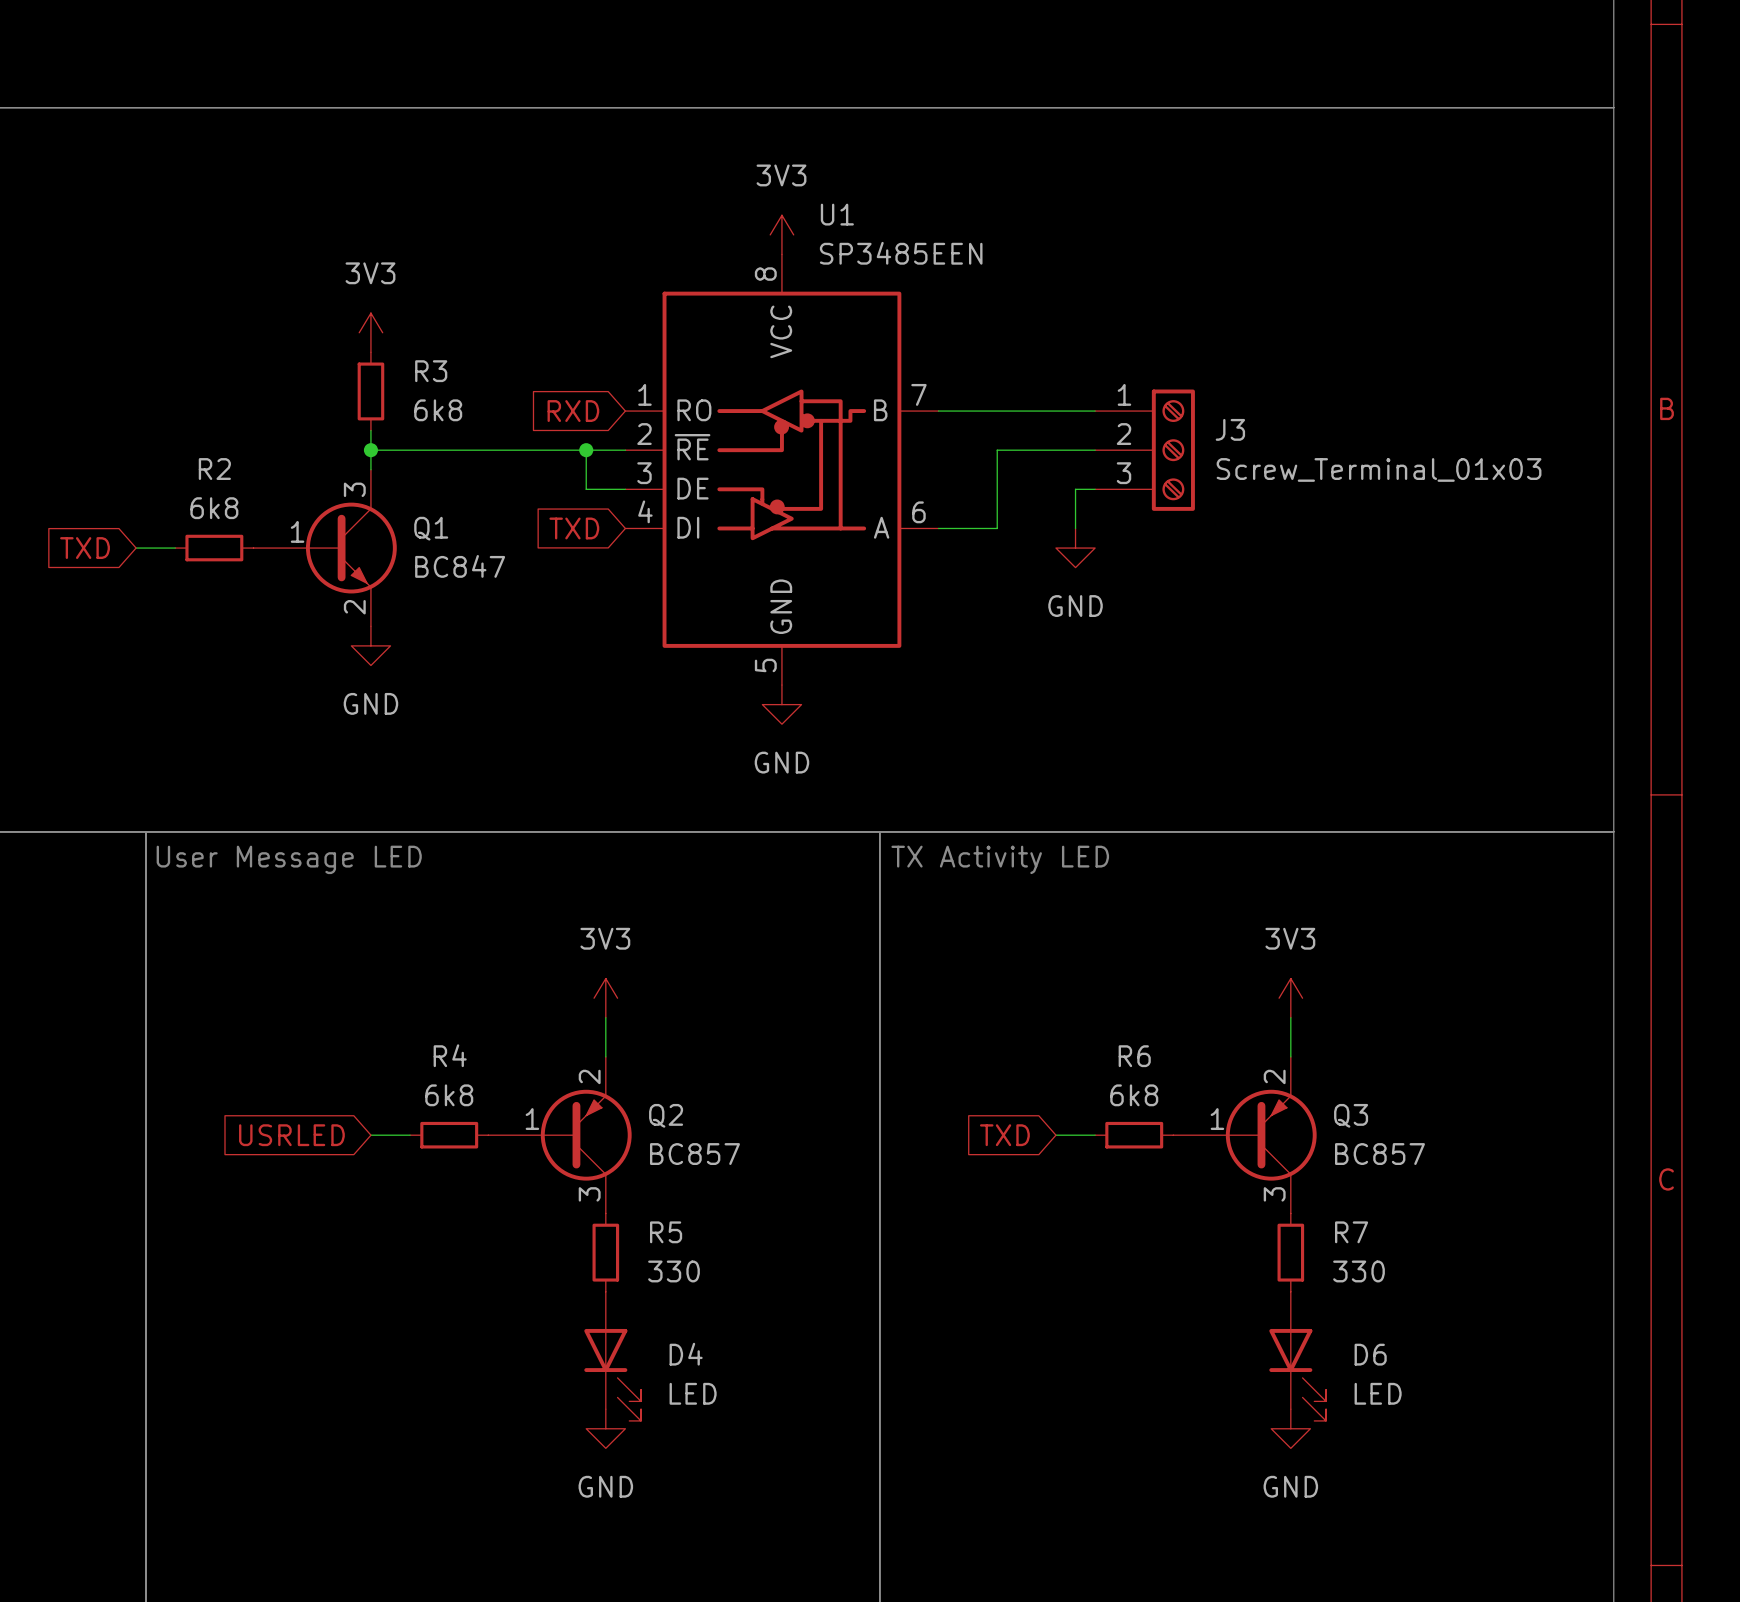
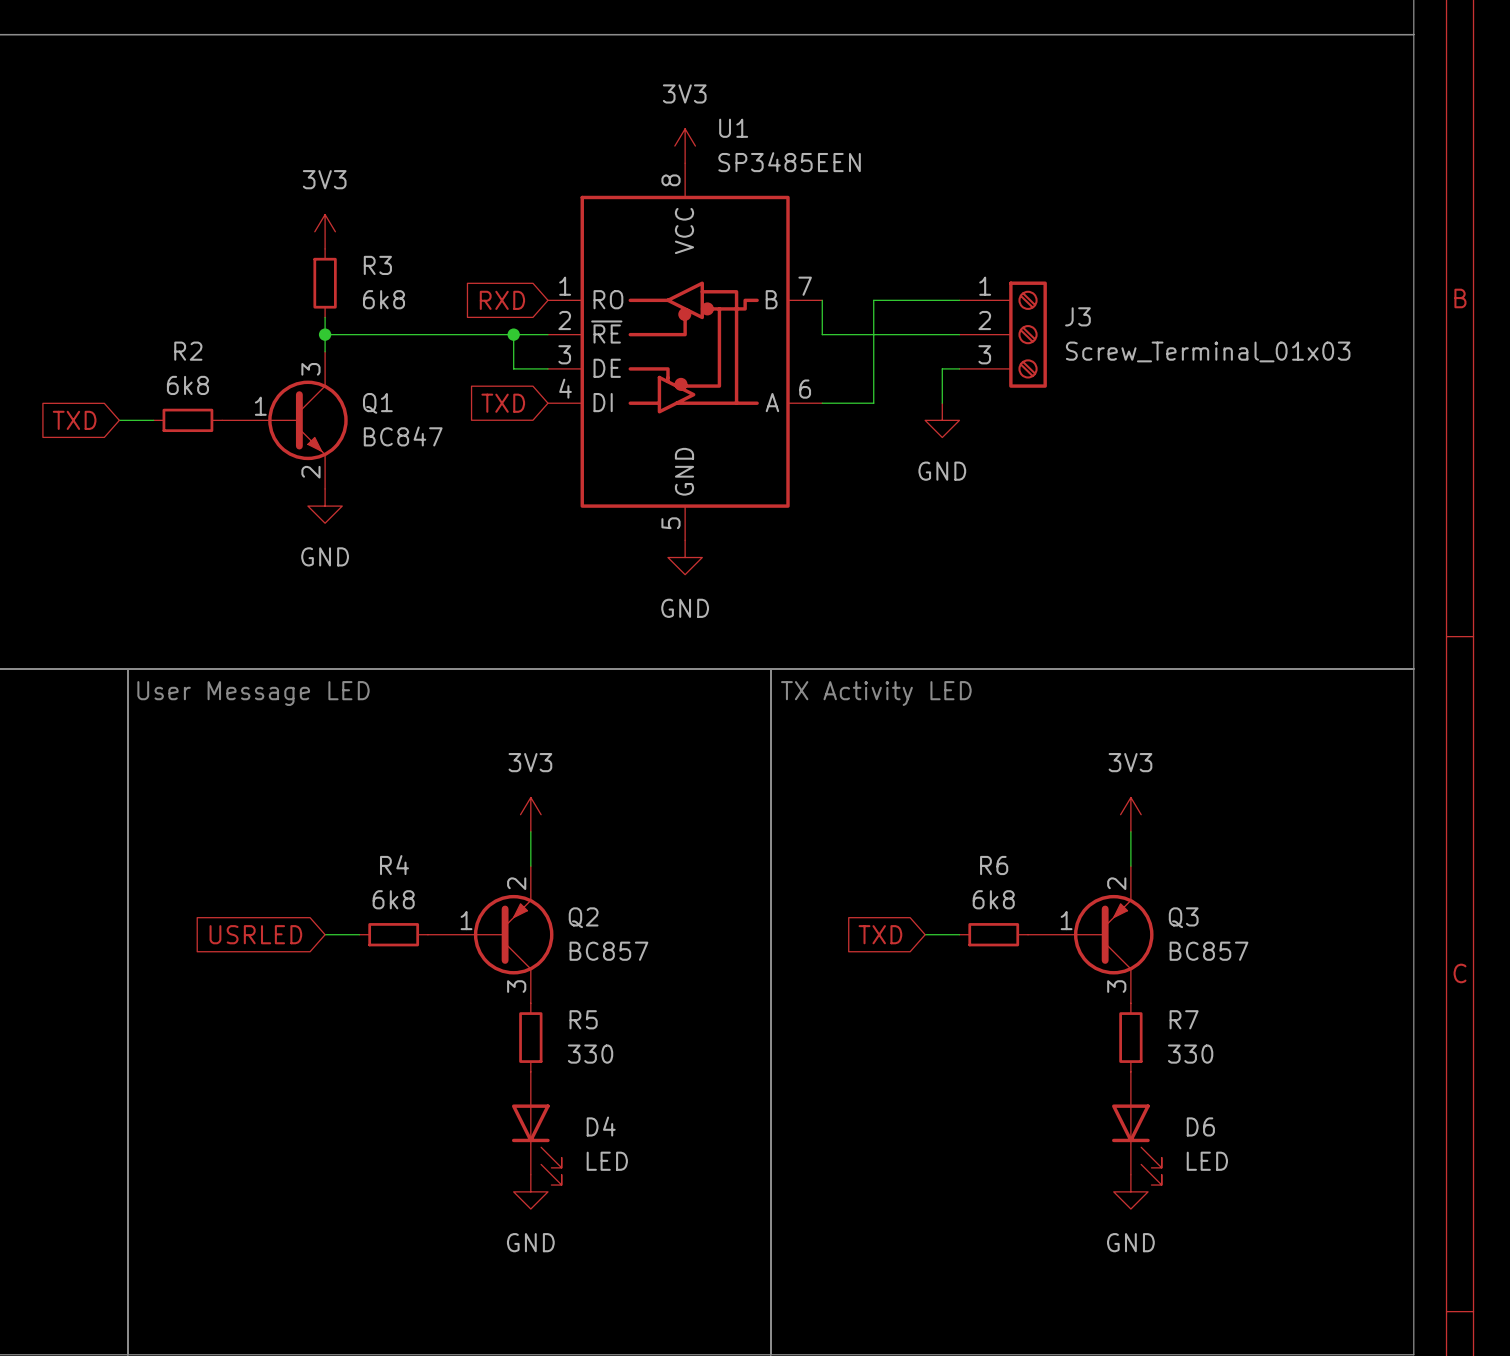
wire: (938, 411) (997, 411) -> (822, 300) (822, 334) (873, 334) (873, 300)

